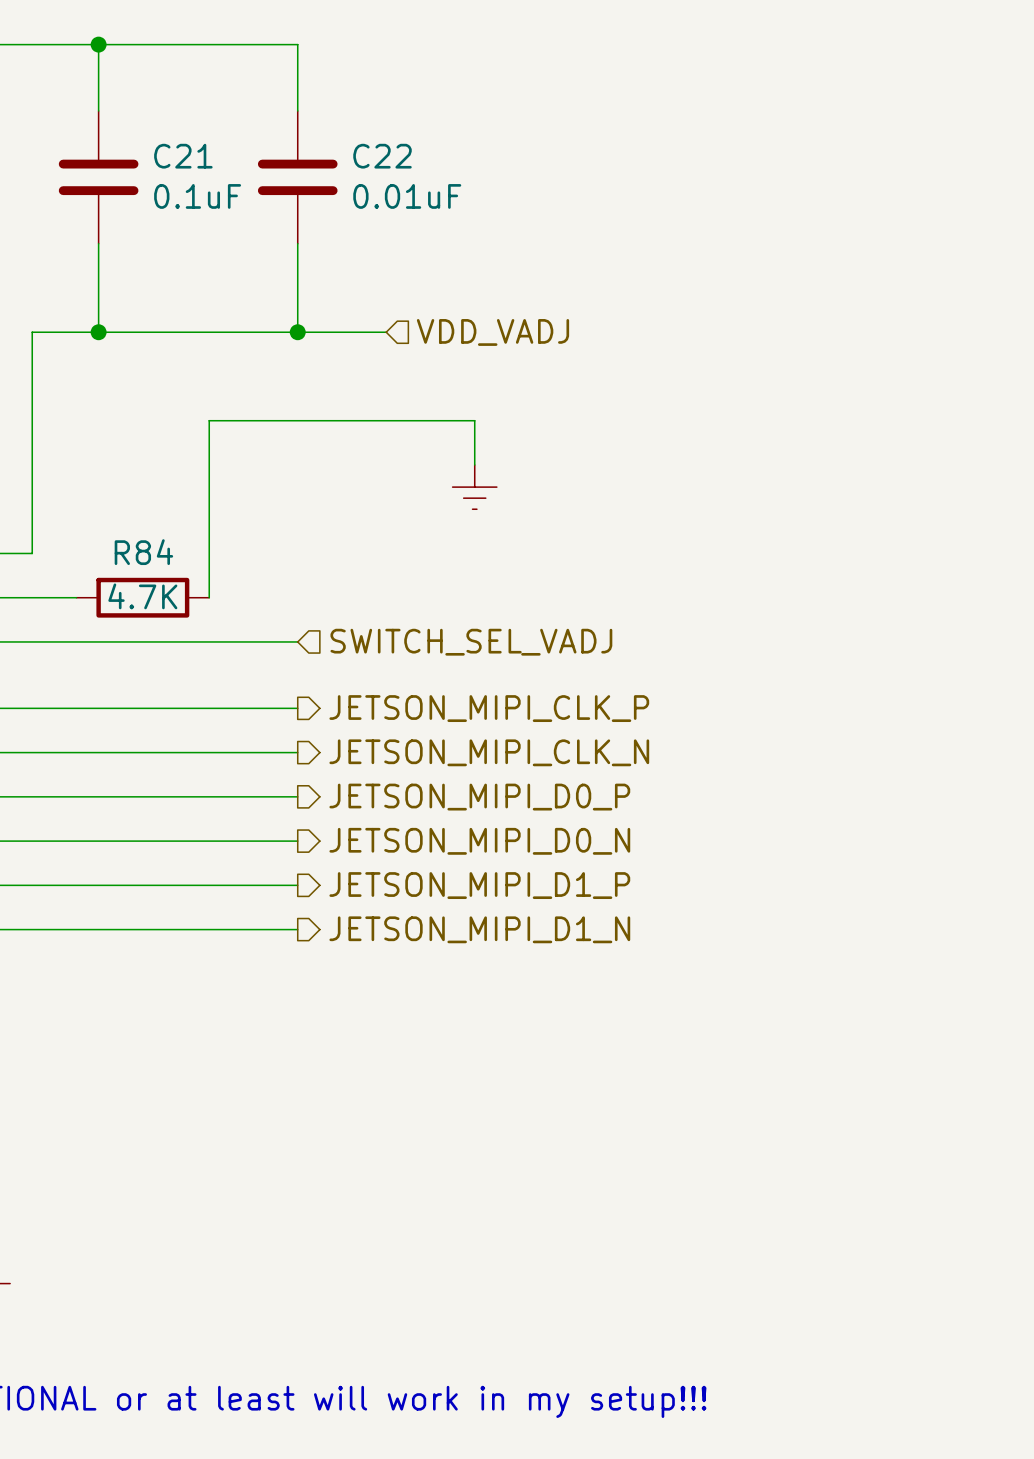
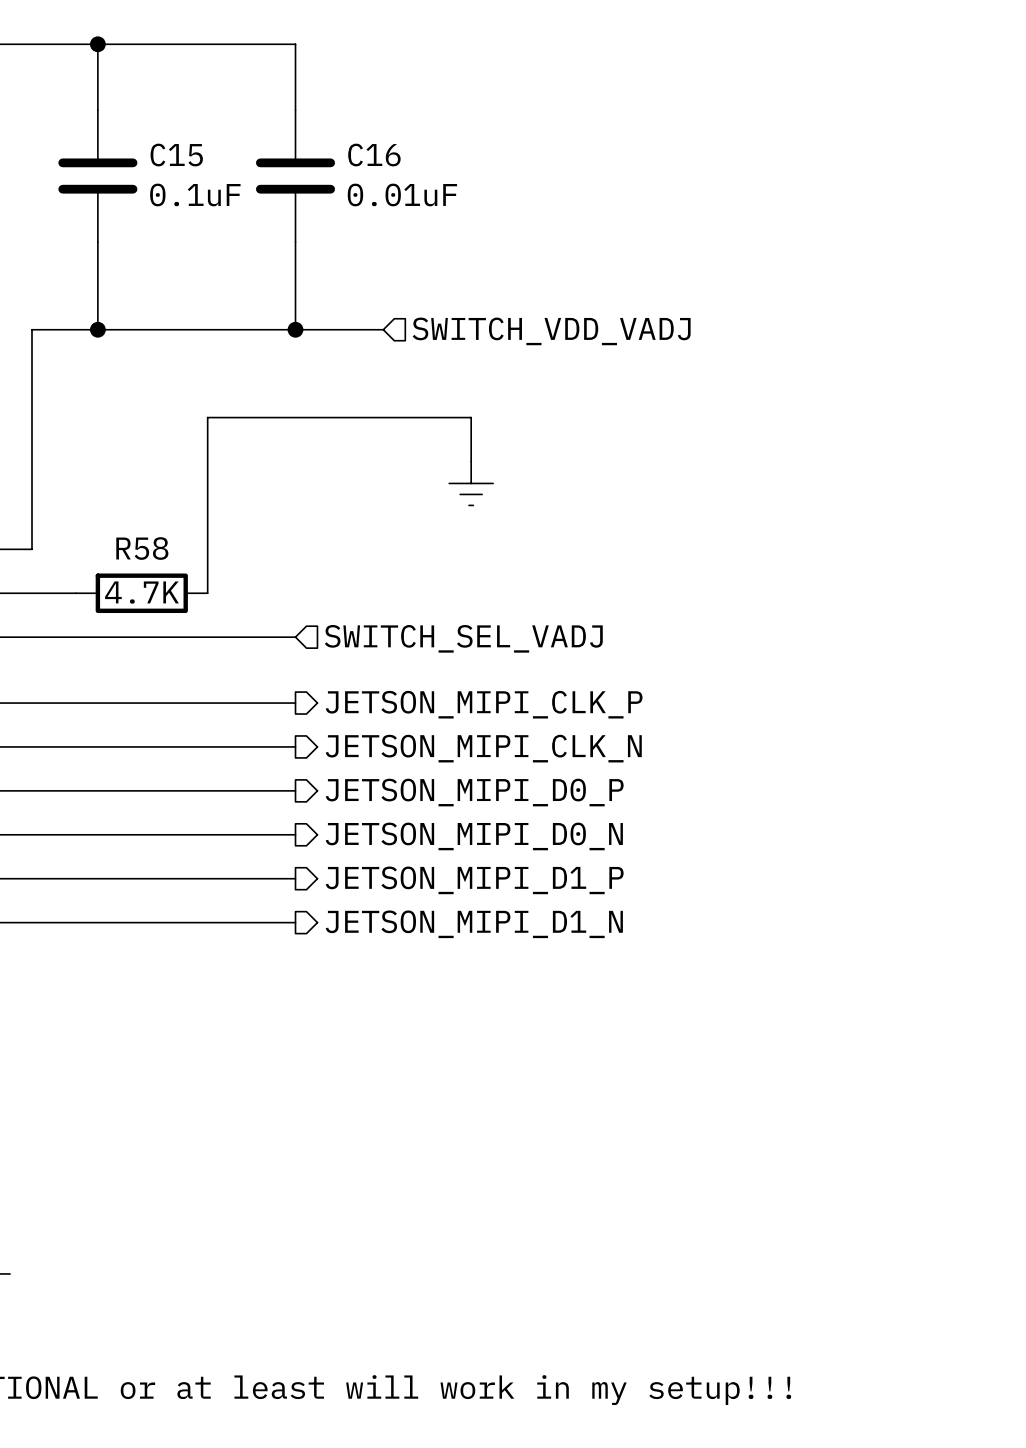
C21 name: C21 (183, 156) -> C15 (176, 155)
C22 name: C22 (382, 156) -> C16 (374, 155)
hierarchical label: VDD_VADJ (492, 332) -> SWITCH_VDD_VADJ (551, 331)
R84 name: R84 (143, 552) -> R58 (142, 548)

